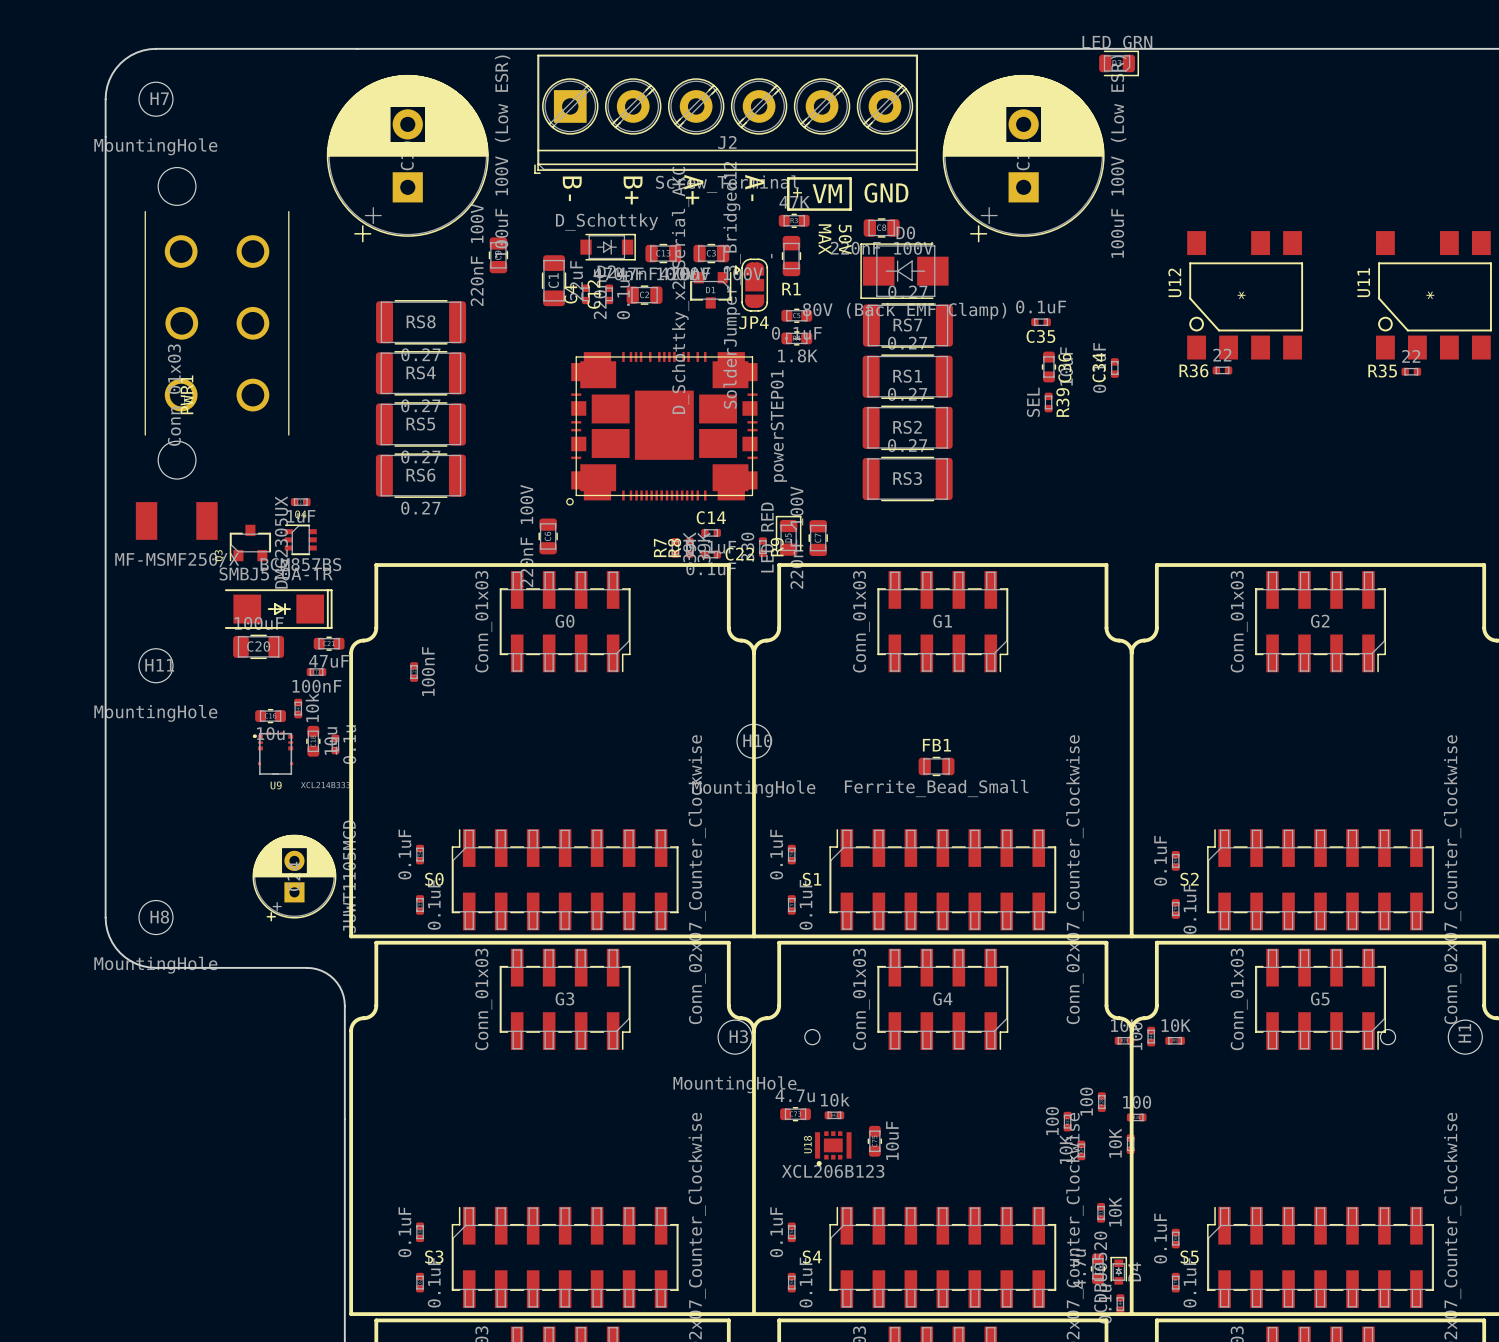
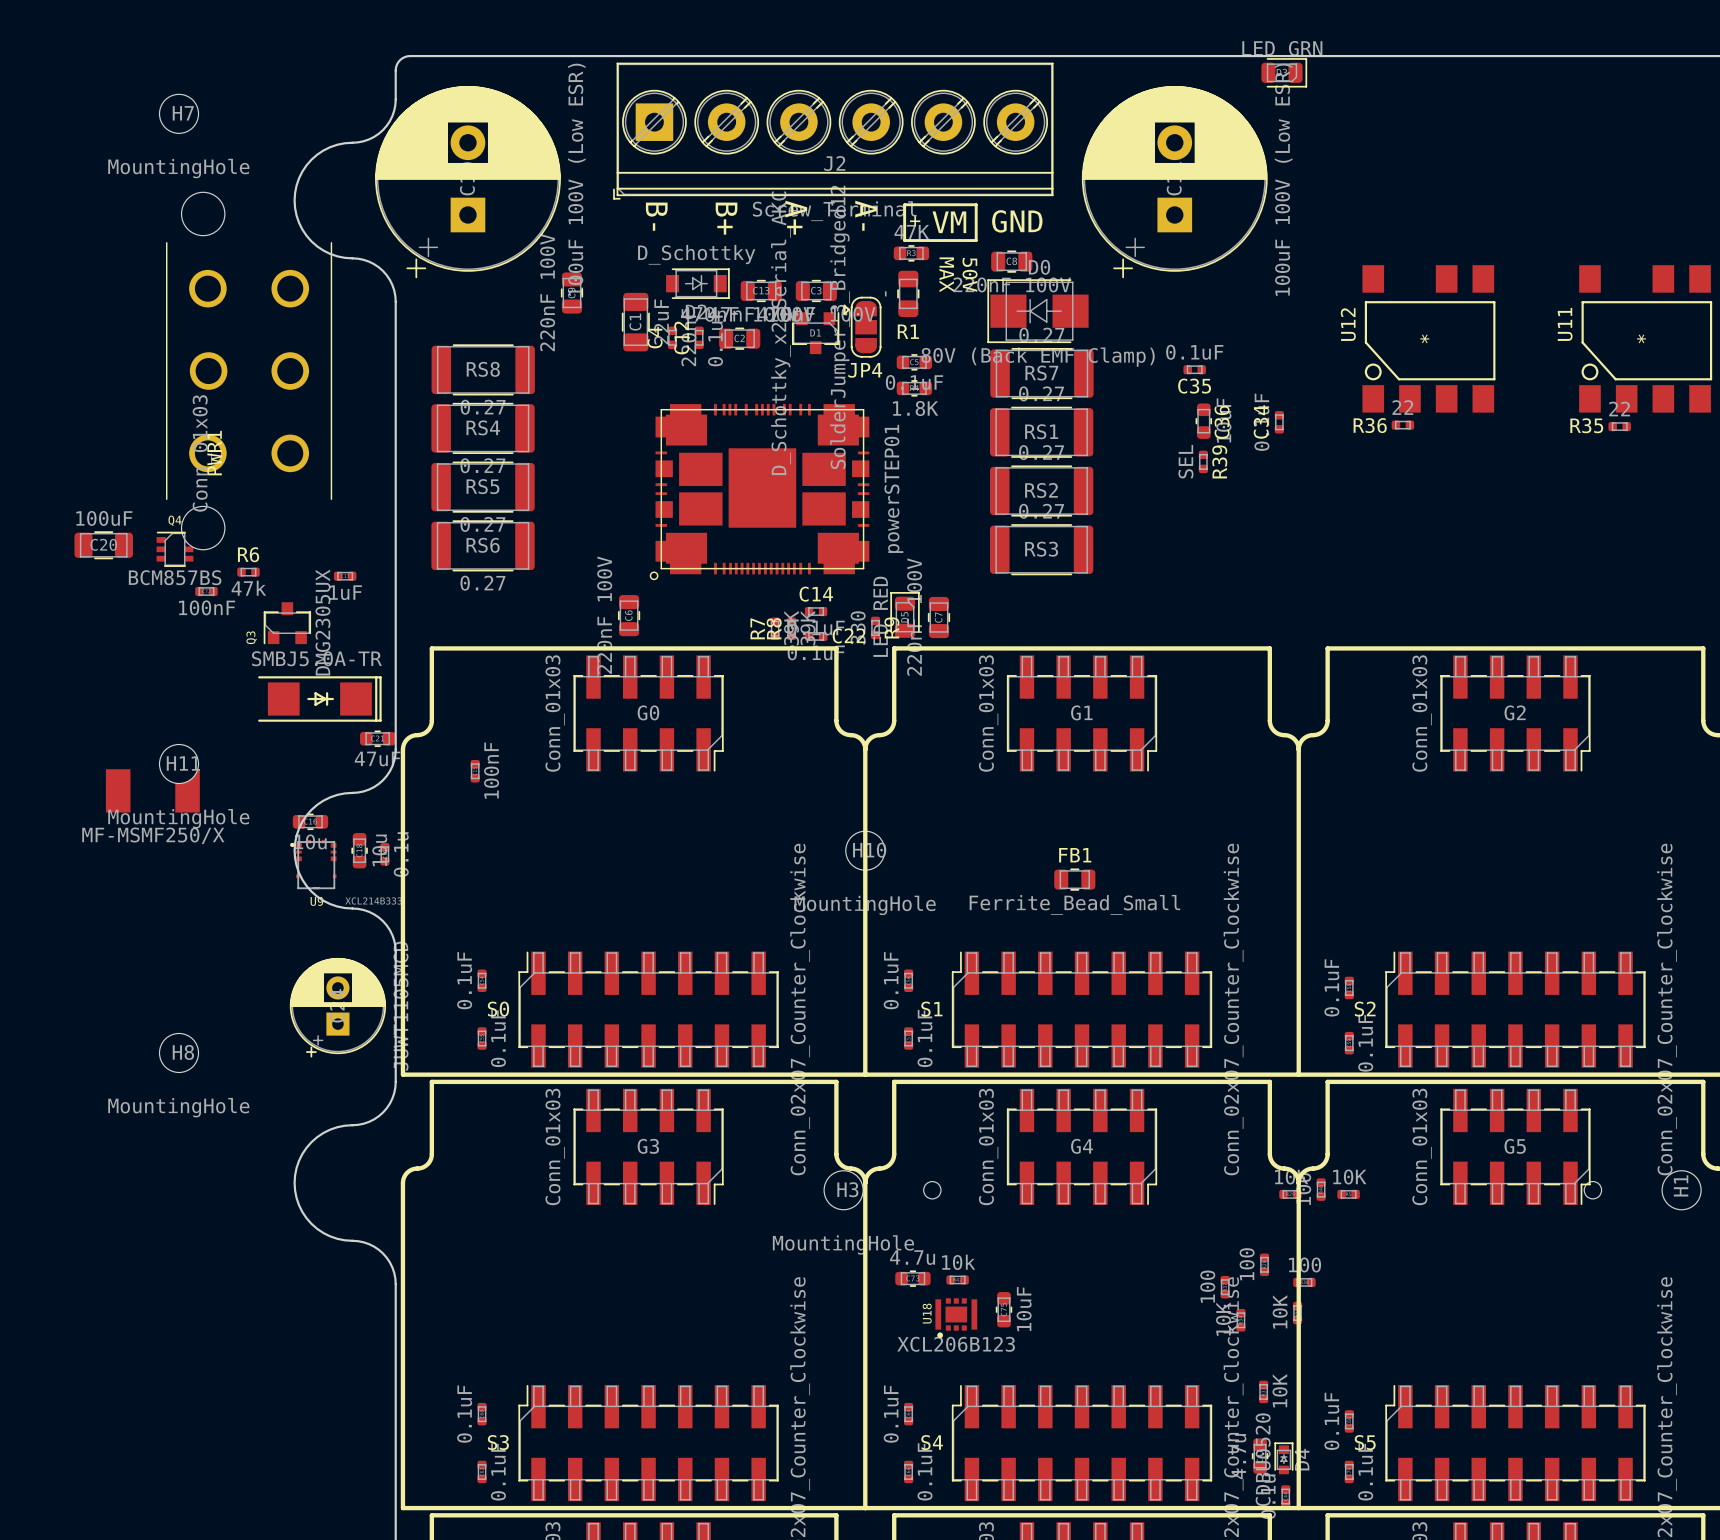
board edge: (357, 48) (155, 48) (142, 50) (125, 59) (116, 68) (107, 86) (105, 99) (105, 917) (107, 930) (112, 942) (120, 953) (130, 961) (142, 966) (155, 967) (307, 967) (321, 970) (330, 975) (339, 986) (344, 1000) (344, 1118) -> (410, 56) (401, 59) (396, 66) (395, 105) (386, 125) (368, 139) (337, 144) (317, 154) (306, 165) (298, 178) (294, 200) (298, 222) (311, 241) (330, 253) (363, 259) (378, 267) (392, 285) (395, 301) (395, 755) (389, 771) (374, 787) (363, 791) (330, 797) (311, 809) (298, 828) (294, 850) (298, 872) (306, 885) (317, 896) (337, 906) (363, 909) (374, 914) (383, 921) (392, 935) (395, 951) (395, 1087) (389, 1103) (374, 1119) (363, 1123) (330, 1129) (311, 1142) (302, 1154) (296, 1168) (295, 1190) (302, 1211) (317, 1228) (337, 1238) (368, 1244) (383, 1253) (392, 1267) (395, 1284)
R6: none -> 47k (248, 572)
part position: (176, 520) -> (152, 790)
Q4 position: (300, 539) -> (174, 549)
C20 position: (258, 646) -> (103, 545)
part position: (316, 672) -> (206, 591)
part: 10k (298, 708) -> none

